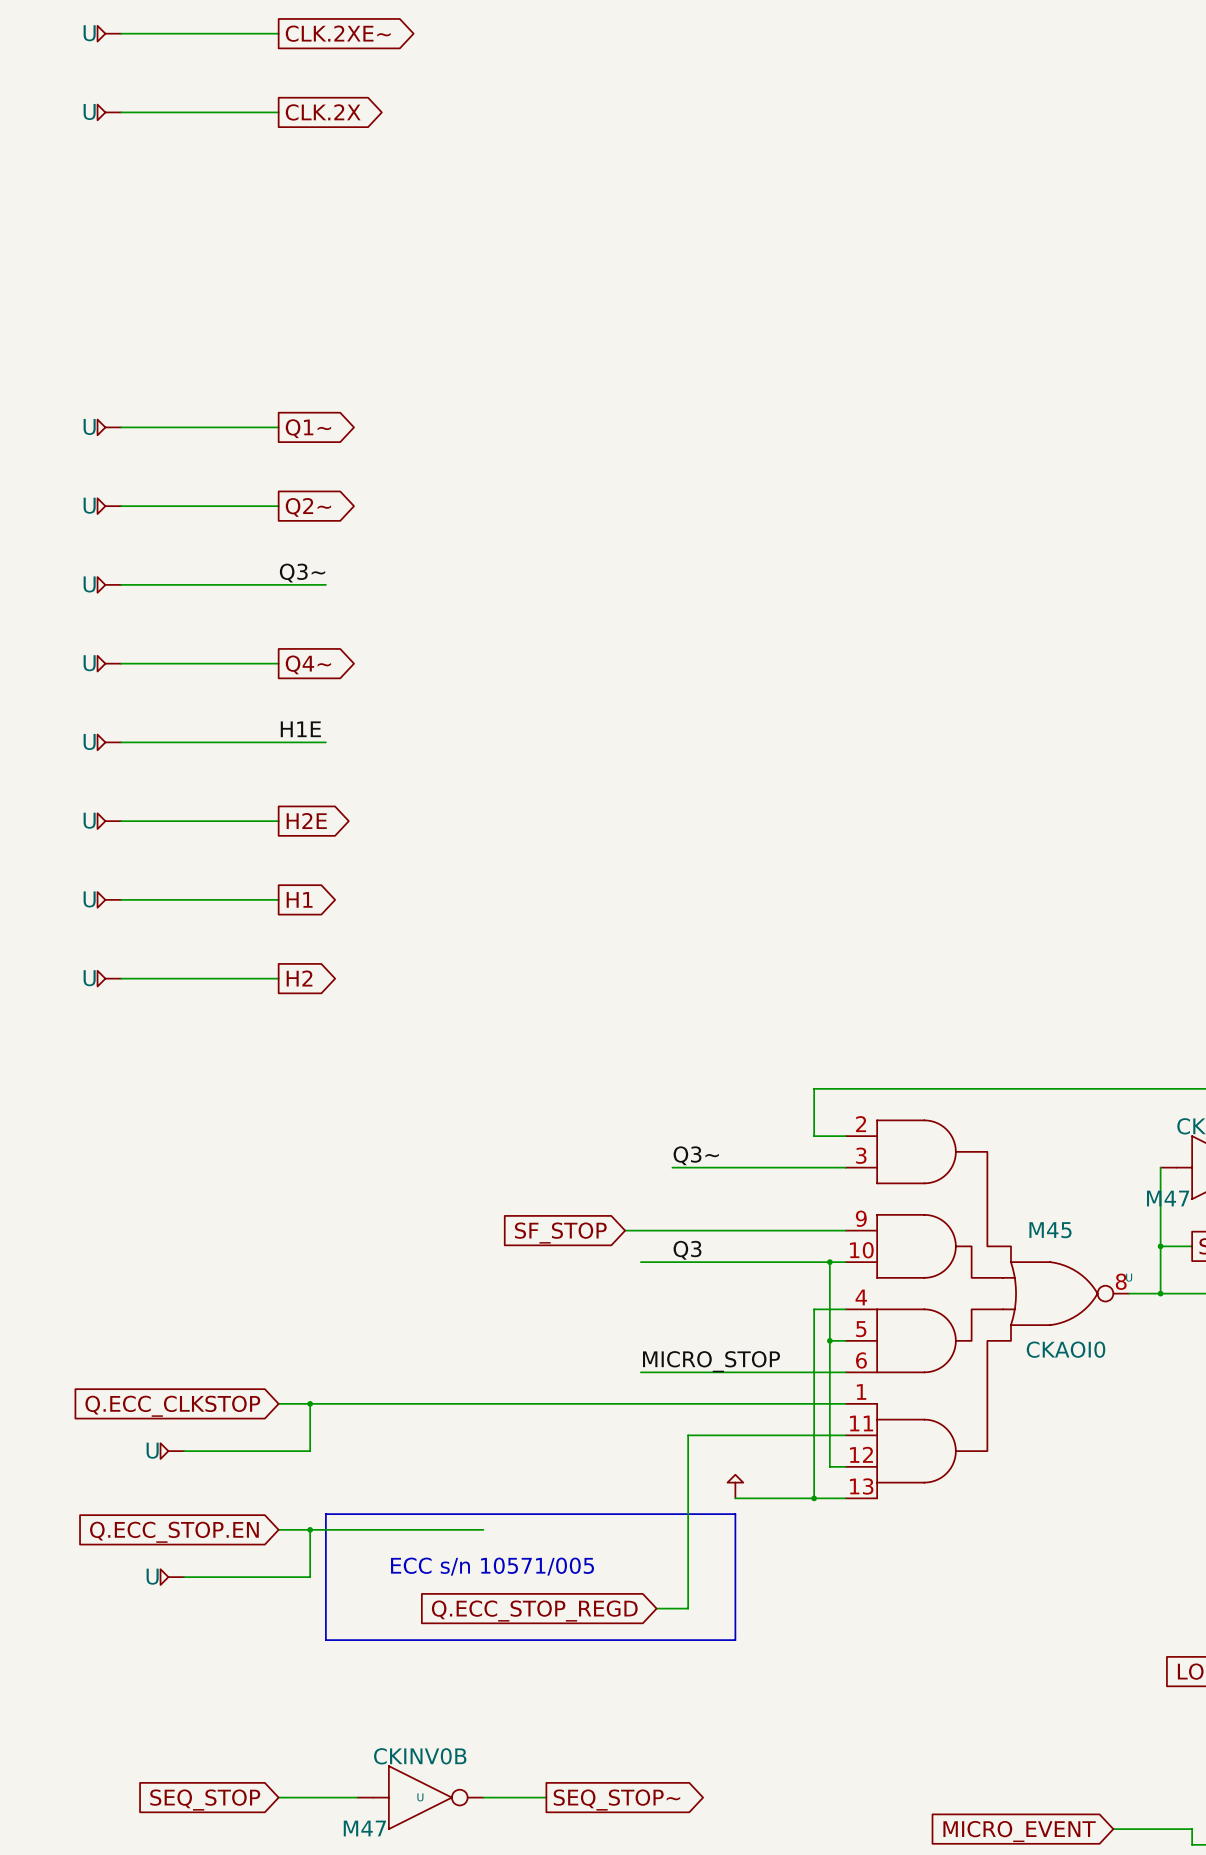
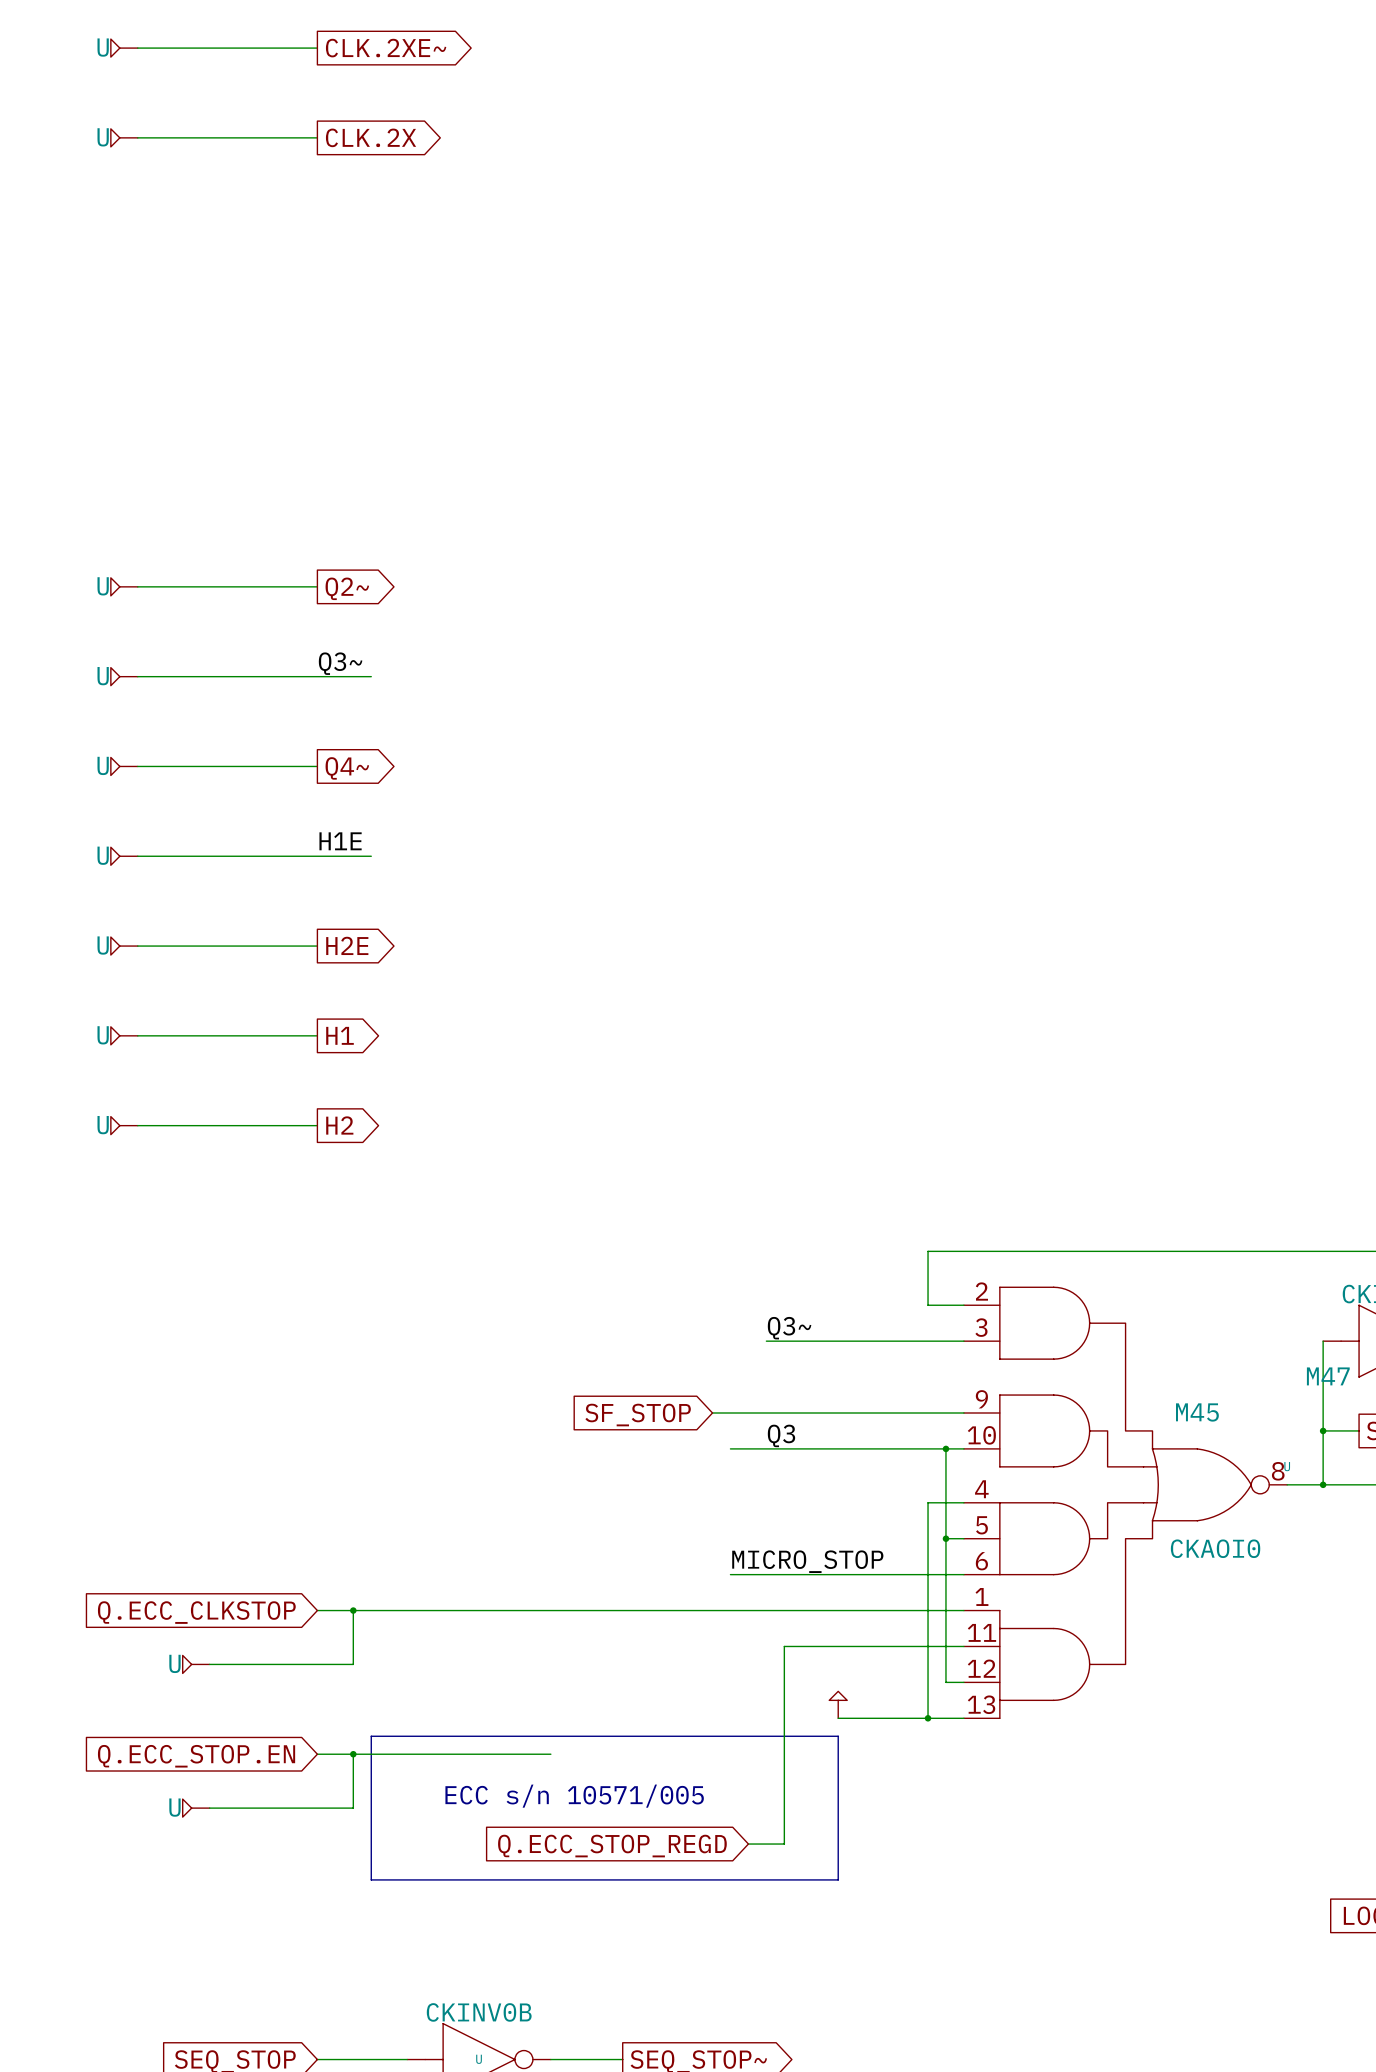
U: (109, 427) -> none
wire: (121, 427) (278, 427) -> none
global label: Q1~ (308, 428) -> none

